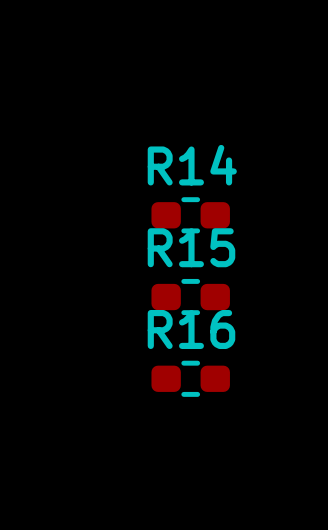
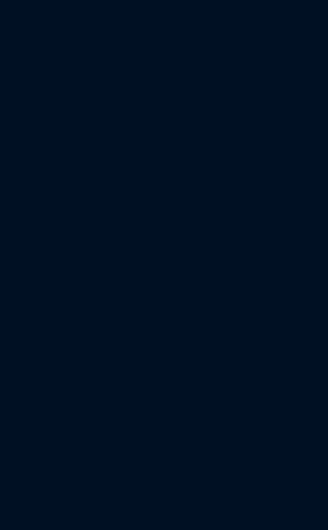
R14: (190, 215) -> none
R15: (190, 297) -> none
R16: (190, 378) -> none

